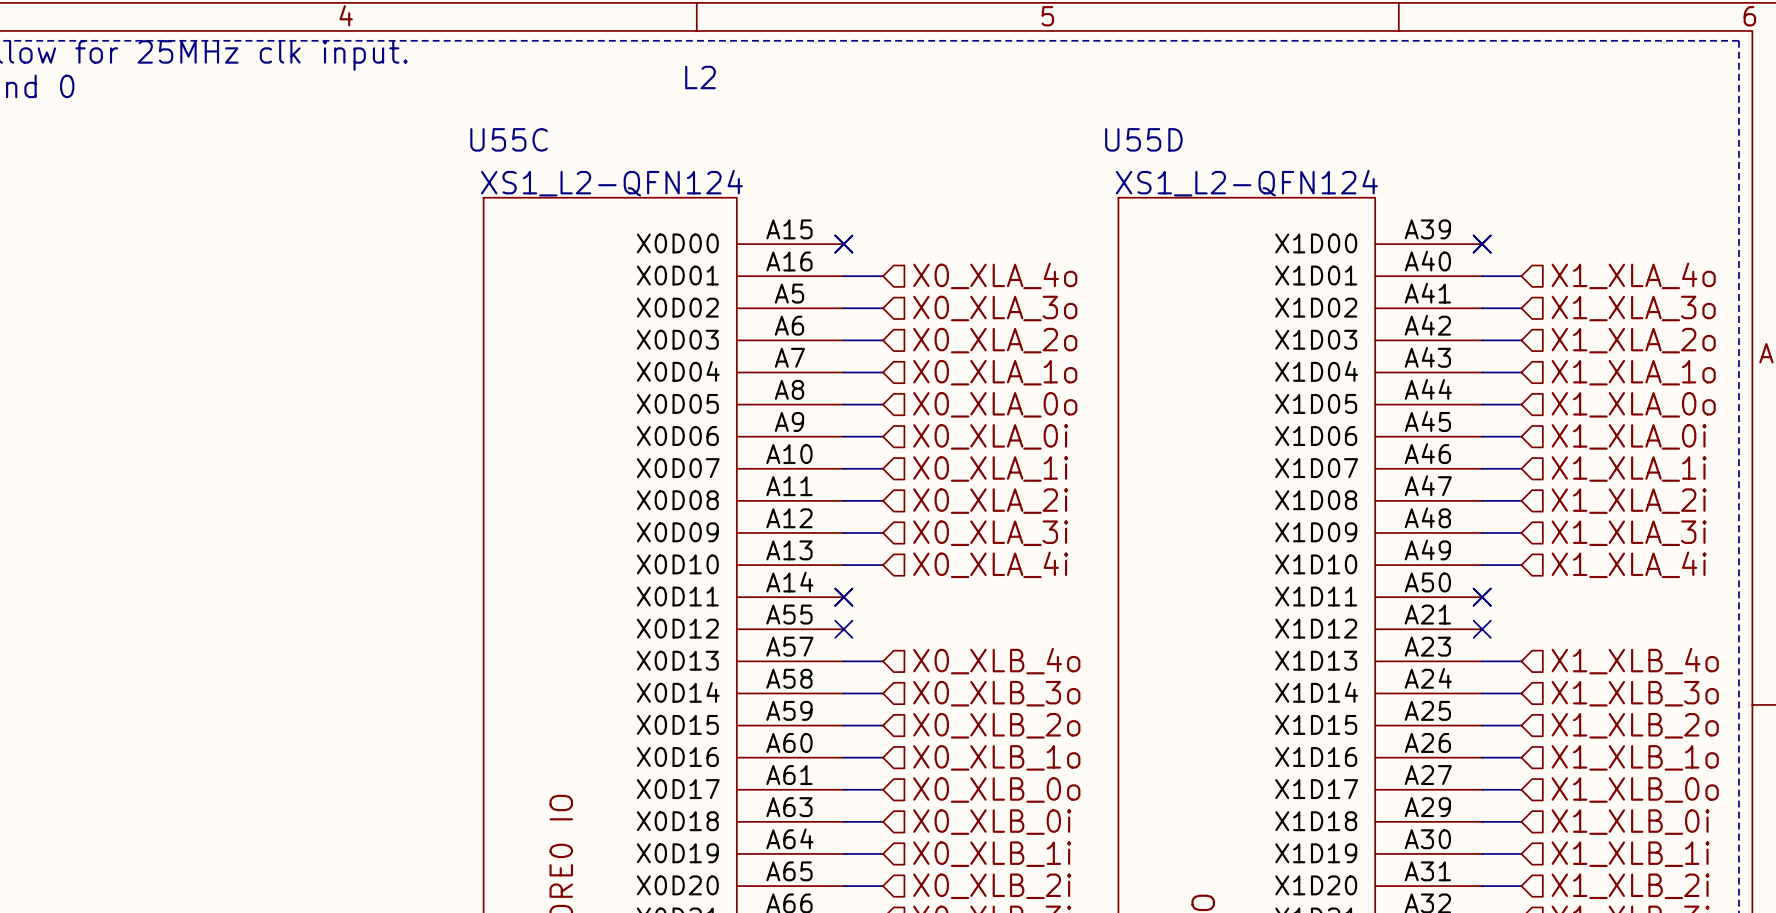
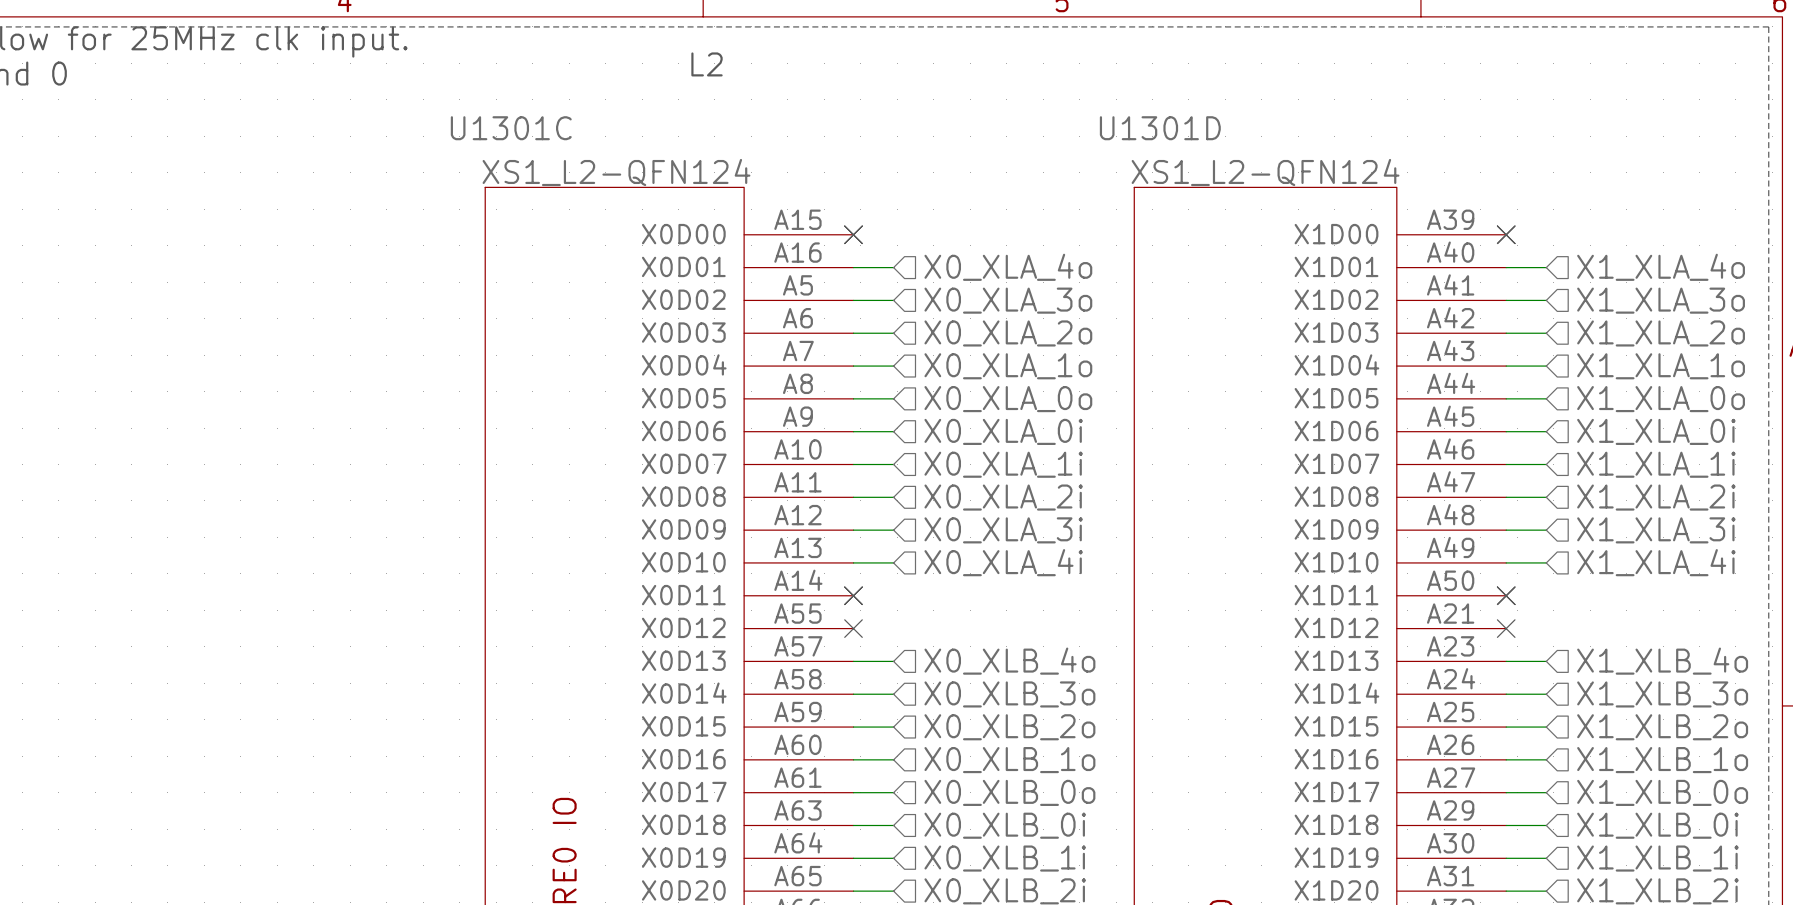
U55C name: U55C (509, 139) -> U1301C (511, 128)
U55D name: U55D (1143, 139) -> U1301D (1160, 128)

